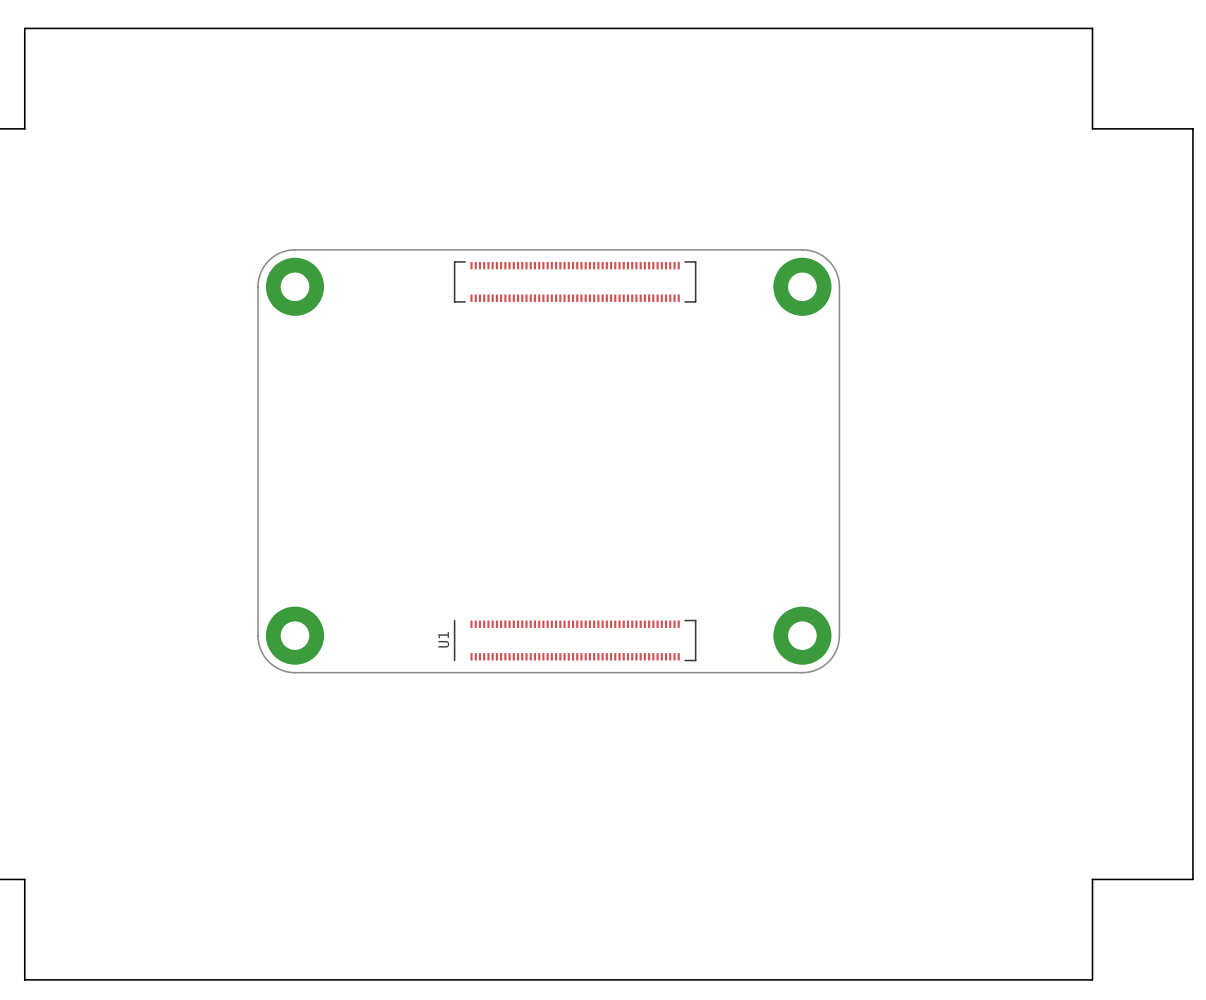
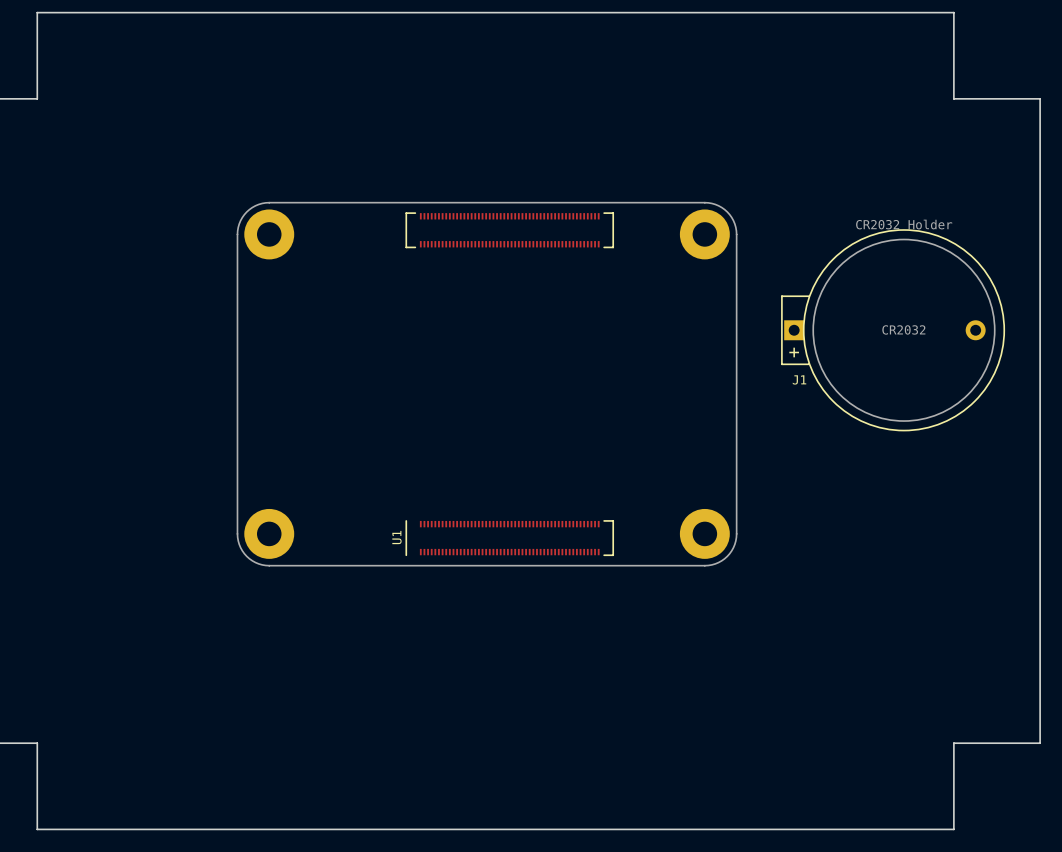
J1: none -> CR2032 Holder (893, 330)

